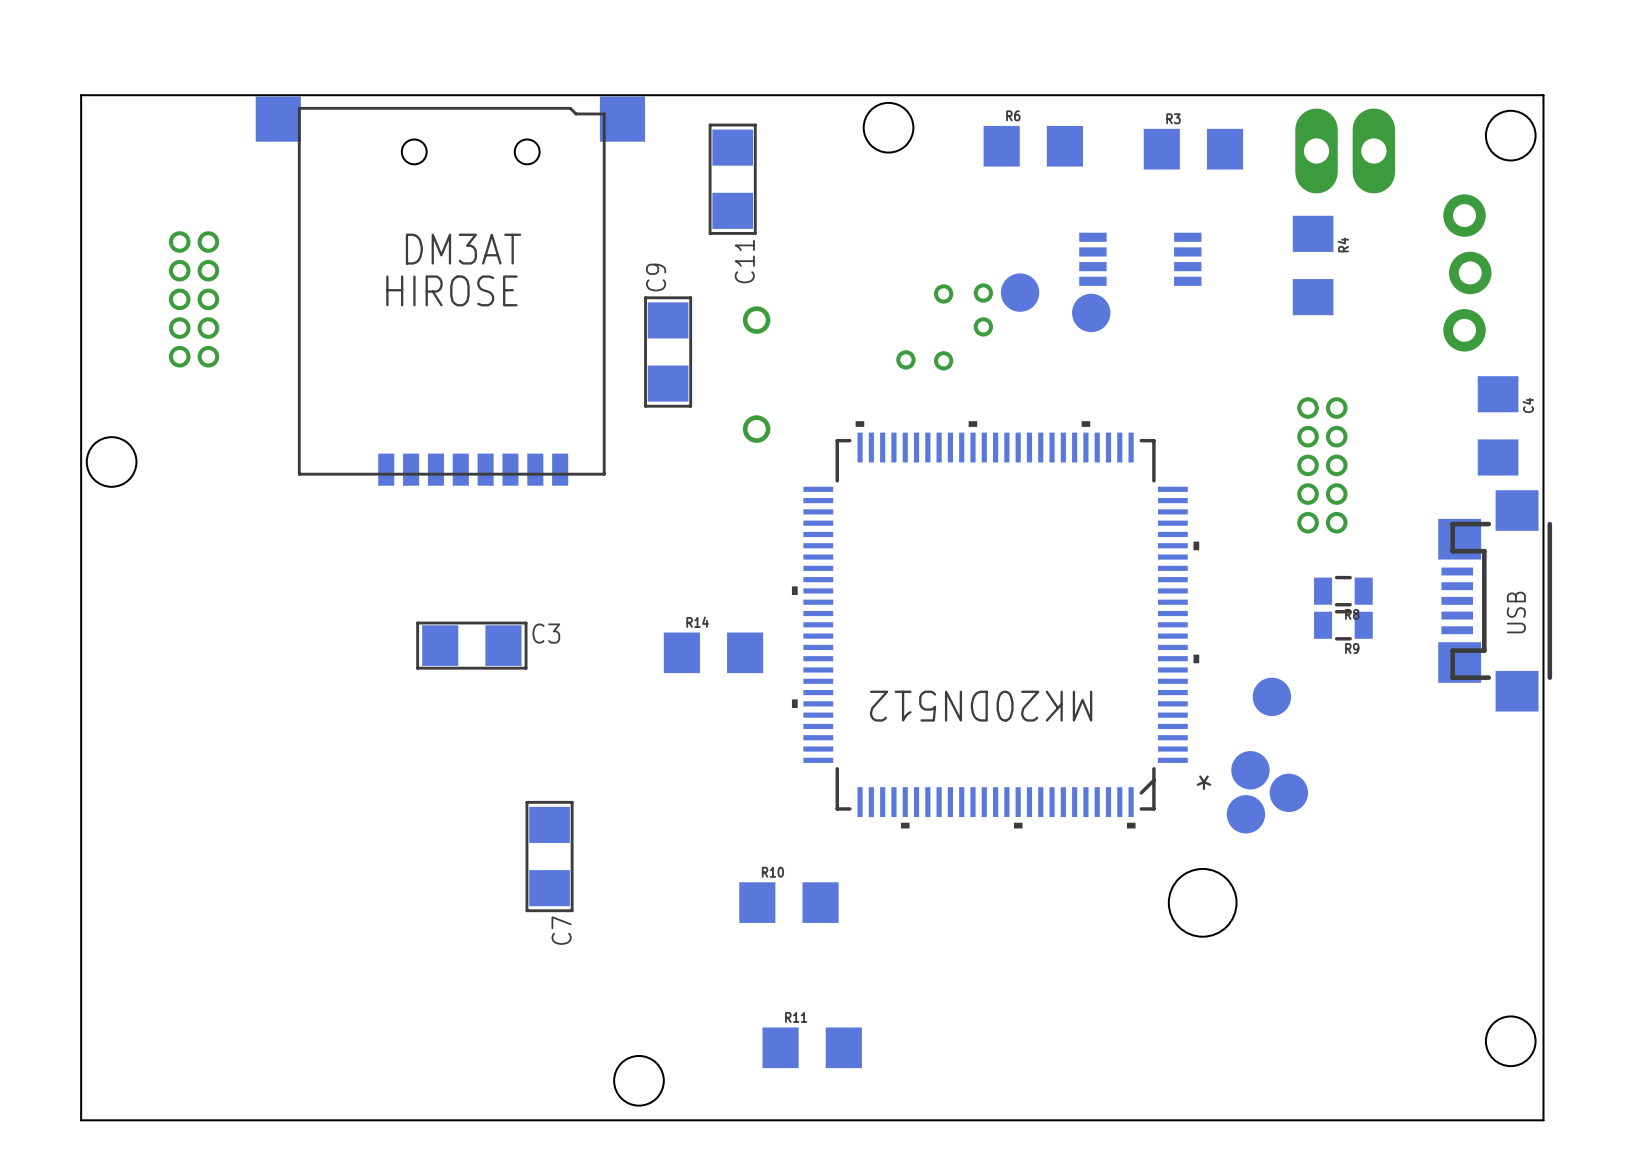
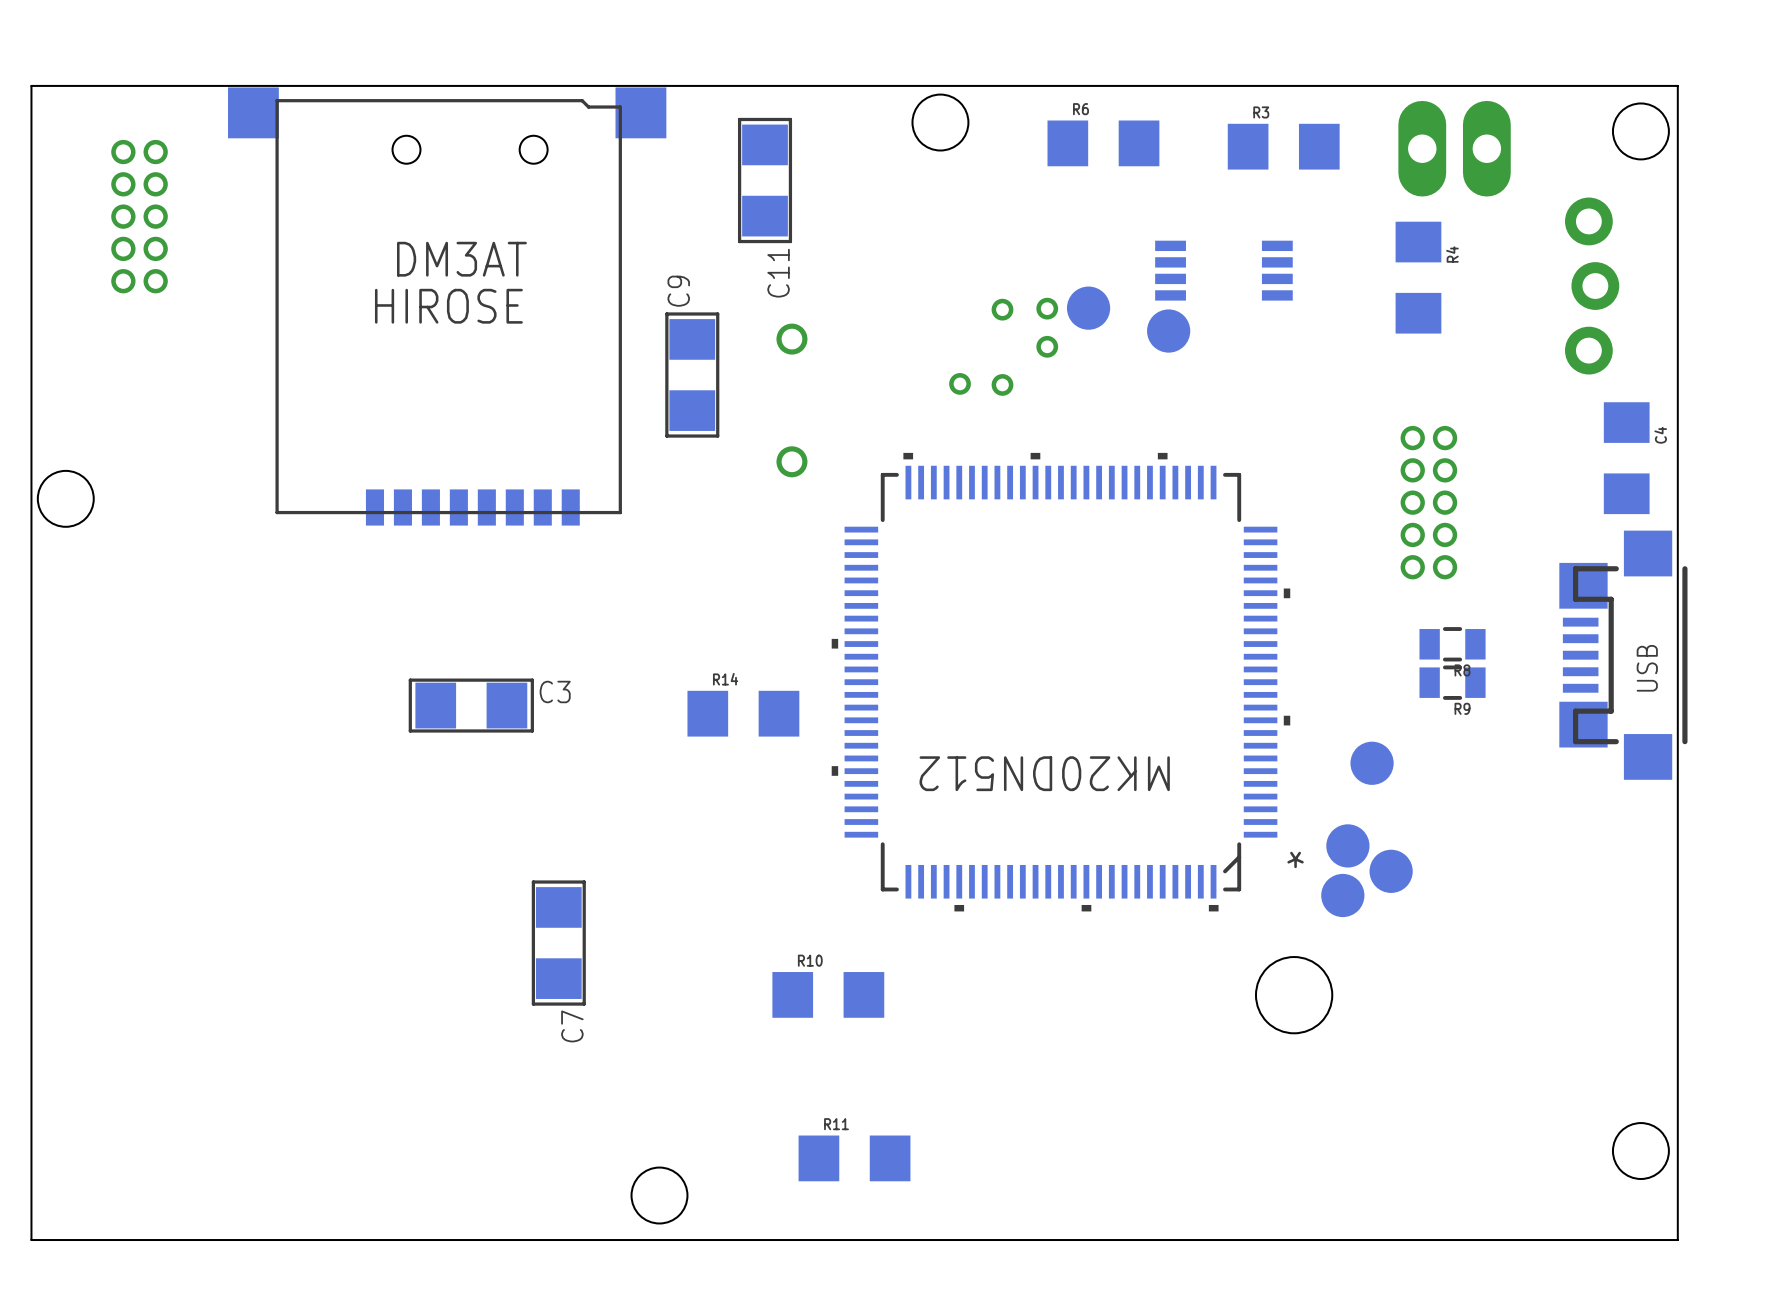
part position: (194, 299) -> (139, 216)

